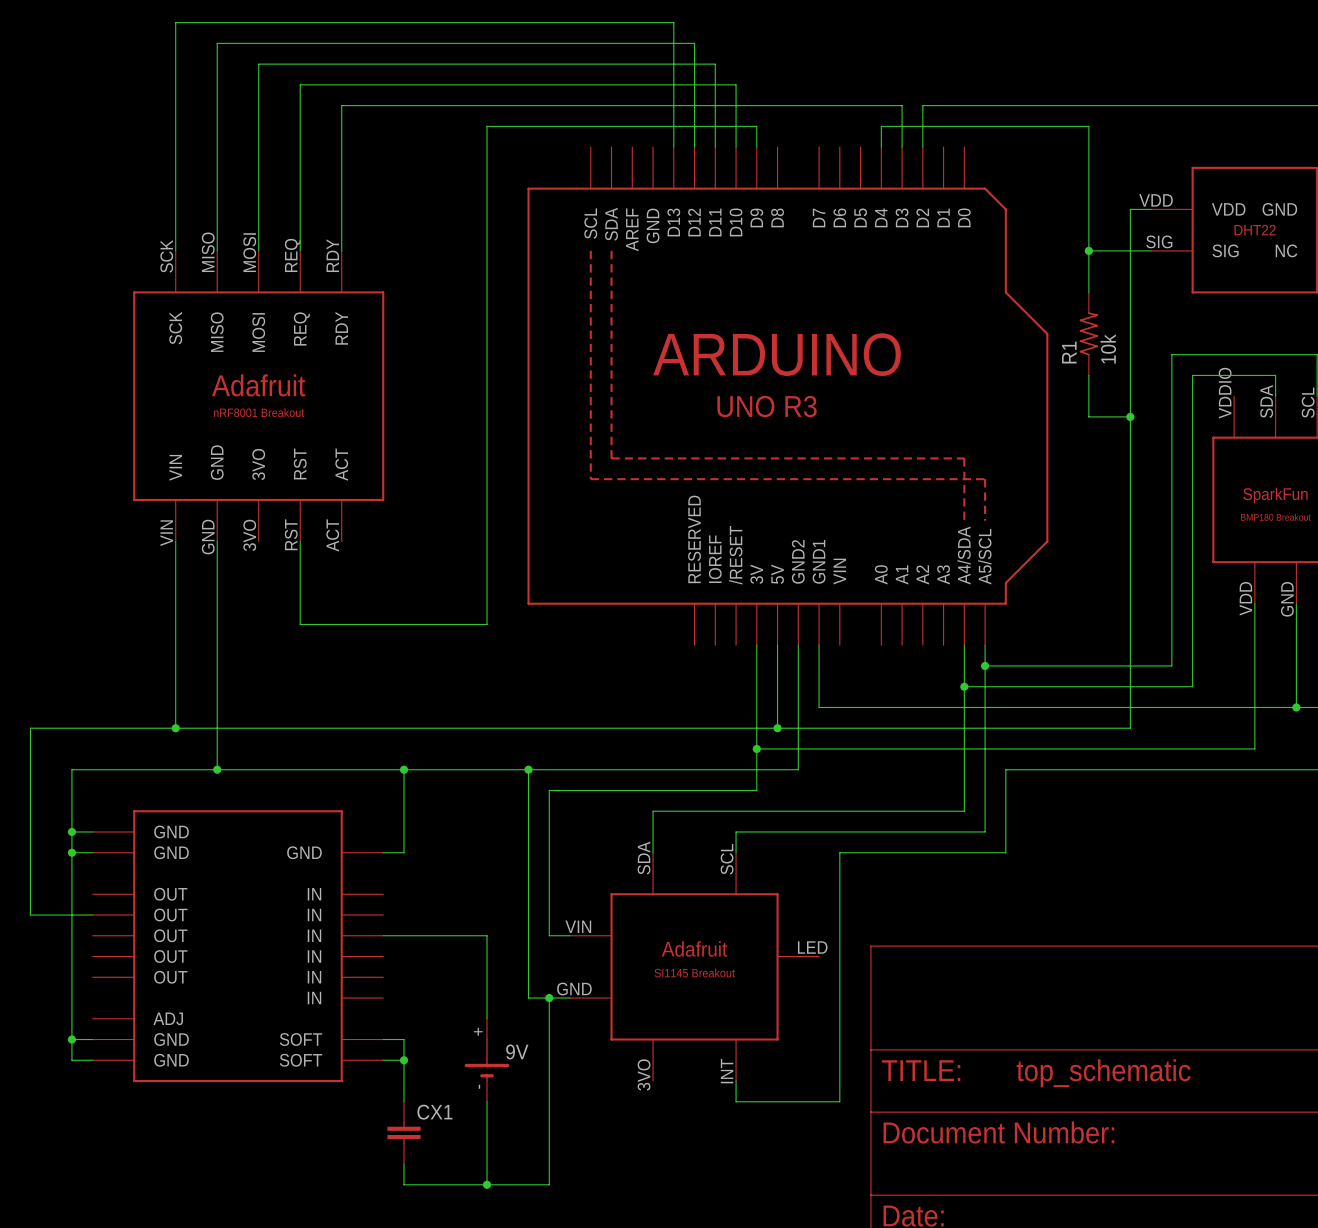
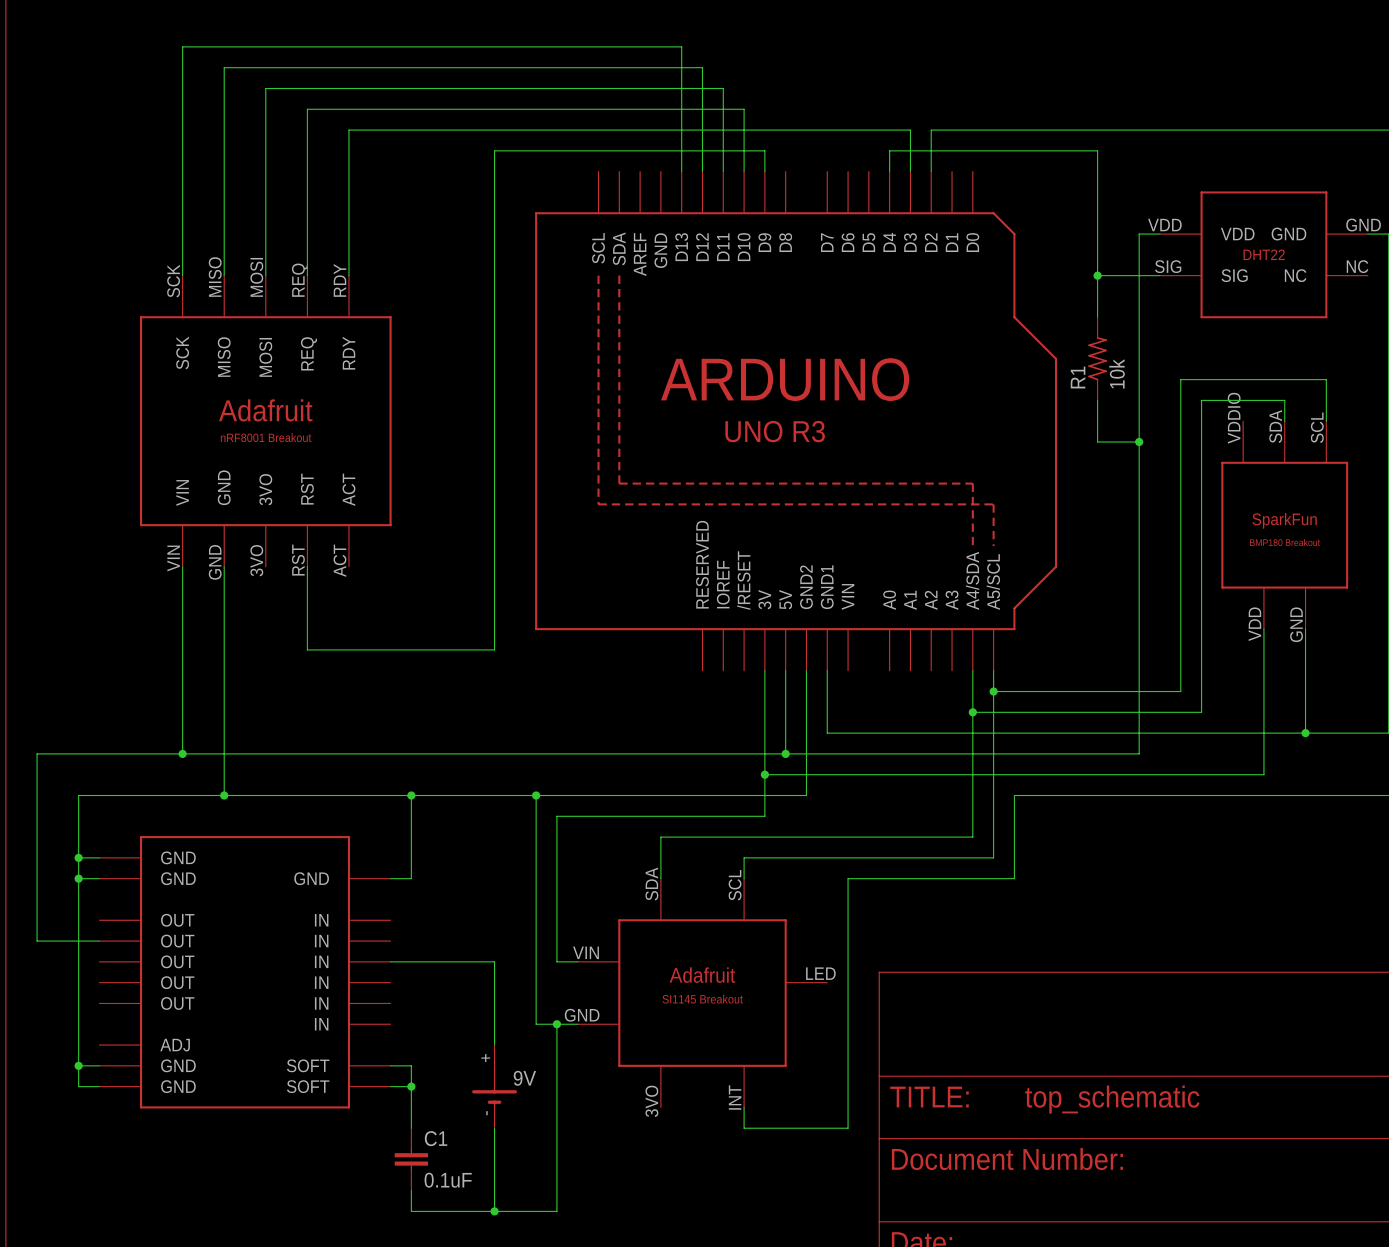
CX1 name: CX1 (434, 1112) -> C1 (436, 1138)
CX1 value: none -> 0.1uF (448, 1180)

